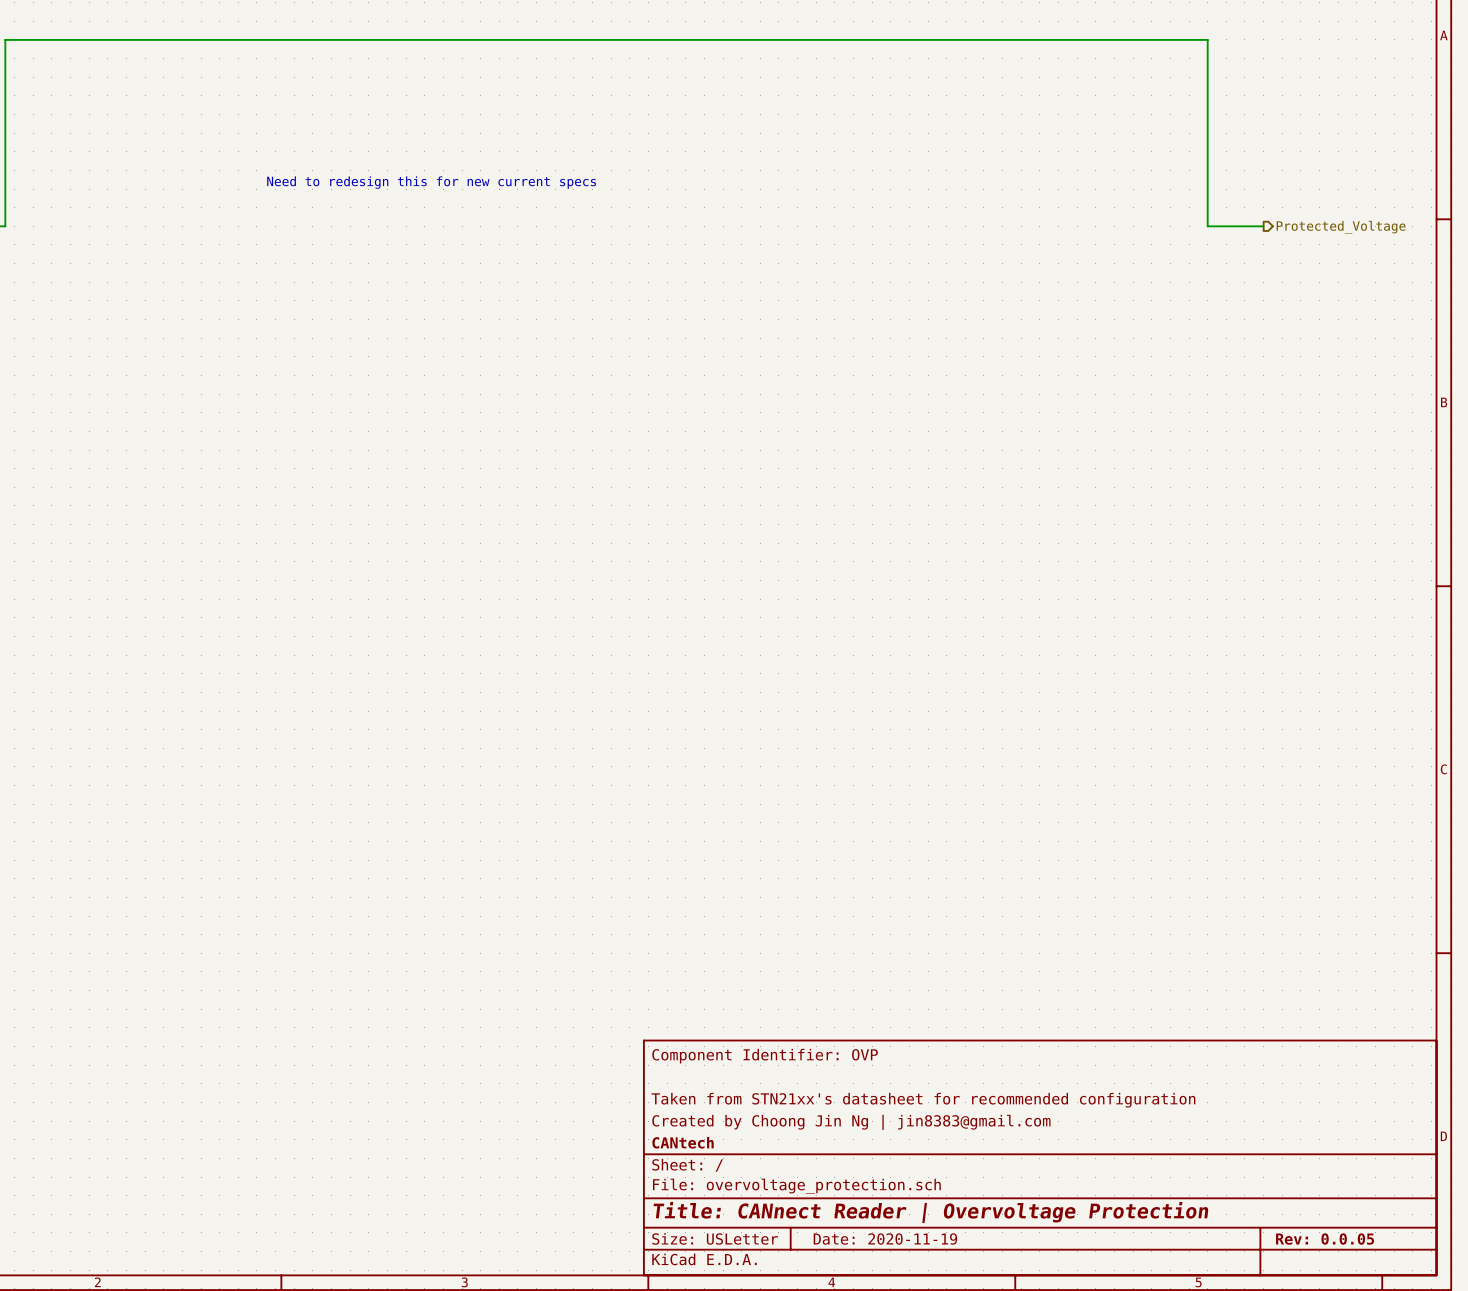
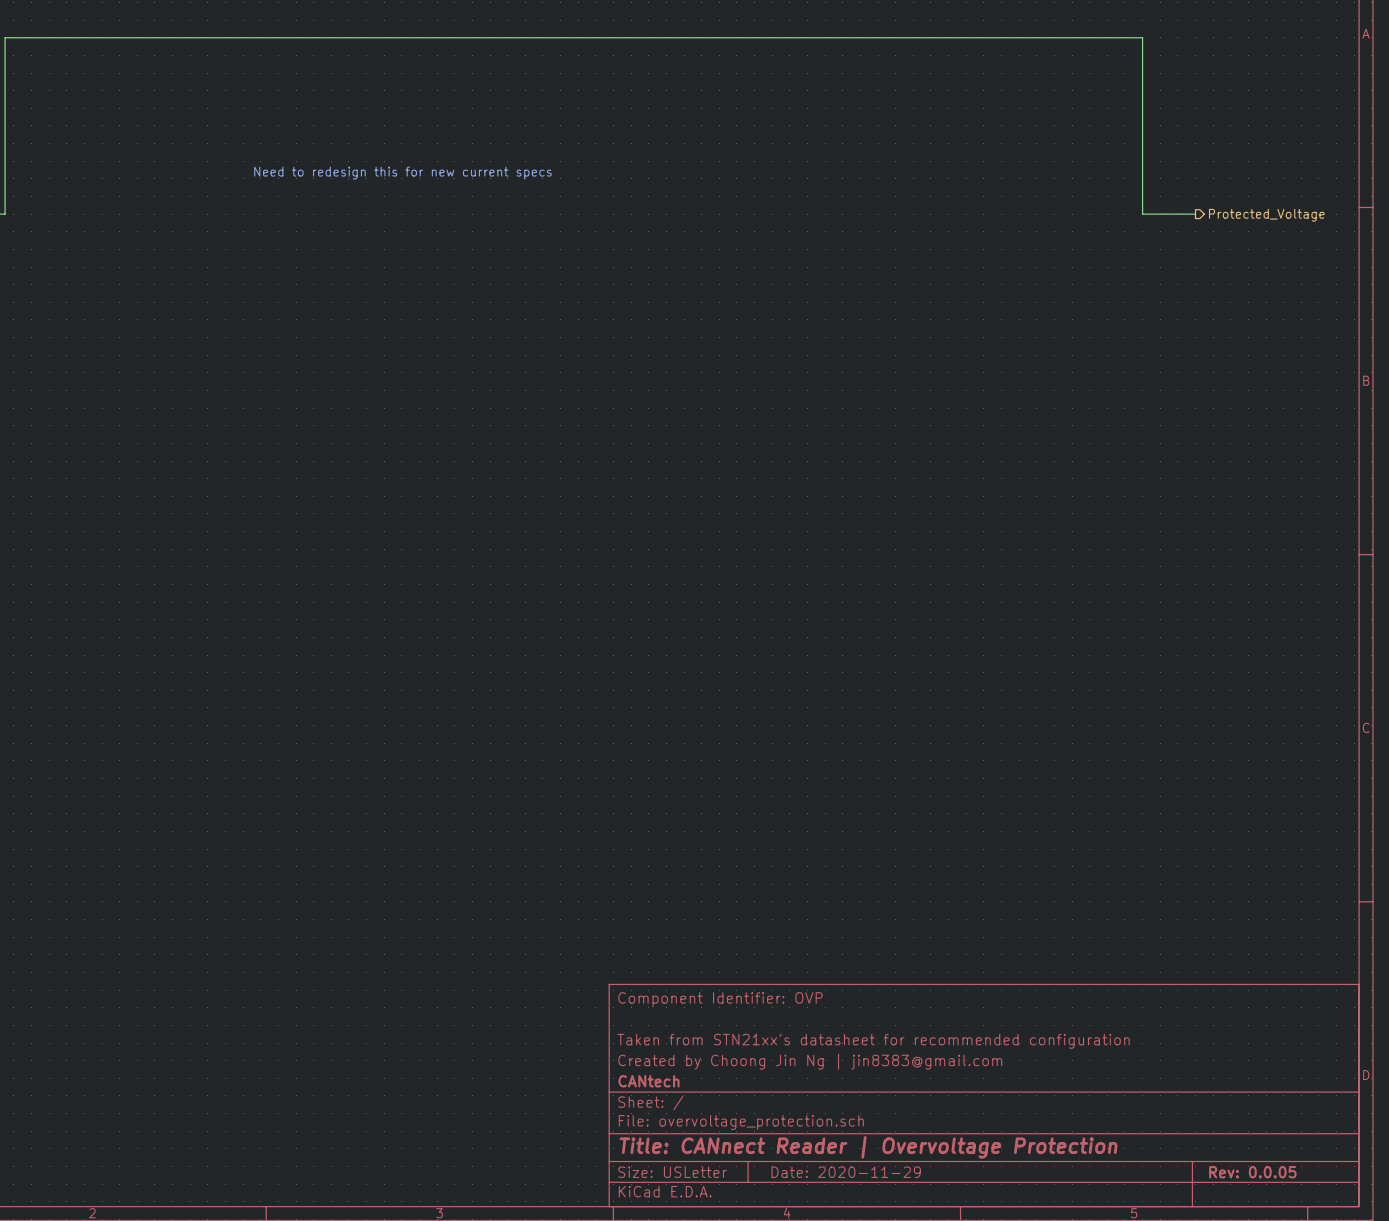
title block: Date: 2020-11-19 (885, 1239) -> Date: 2020-11-29 (846, 1172)

